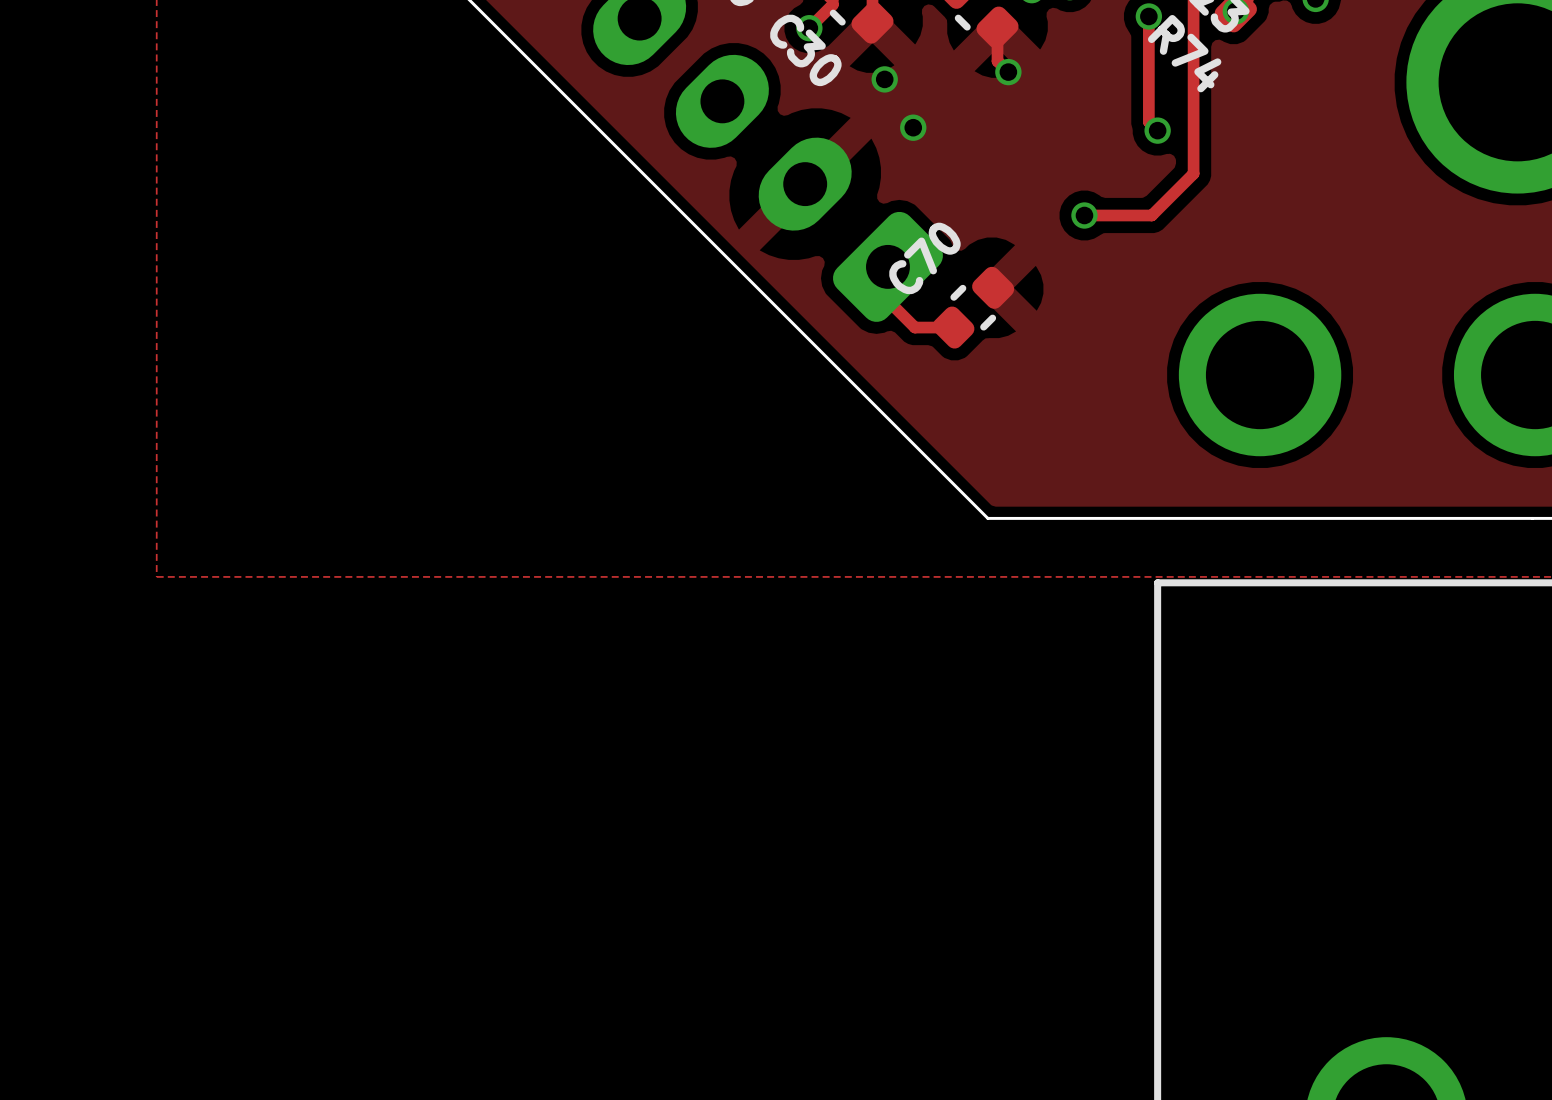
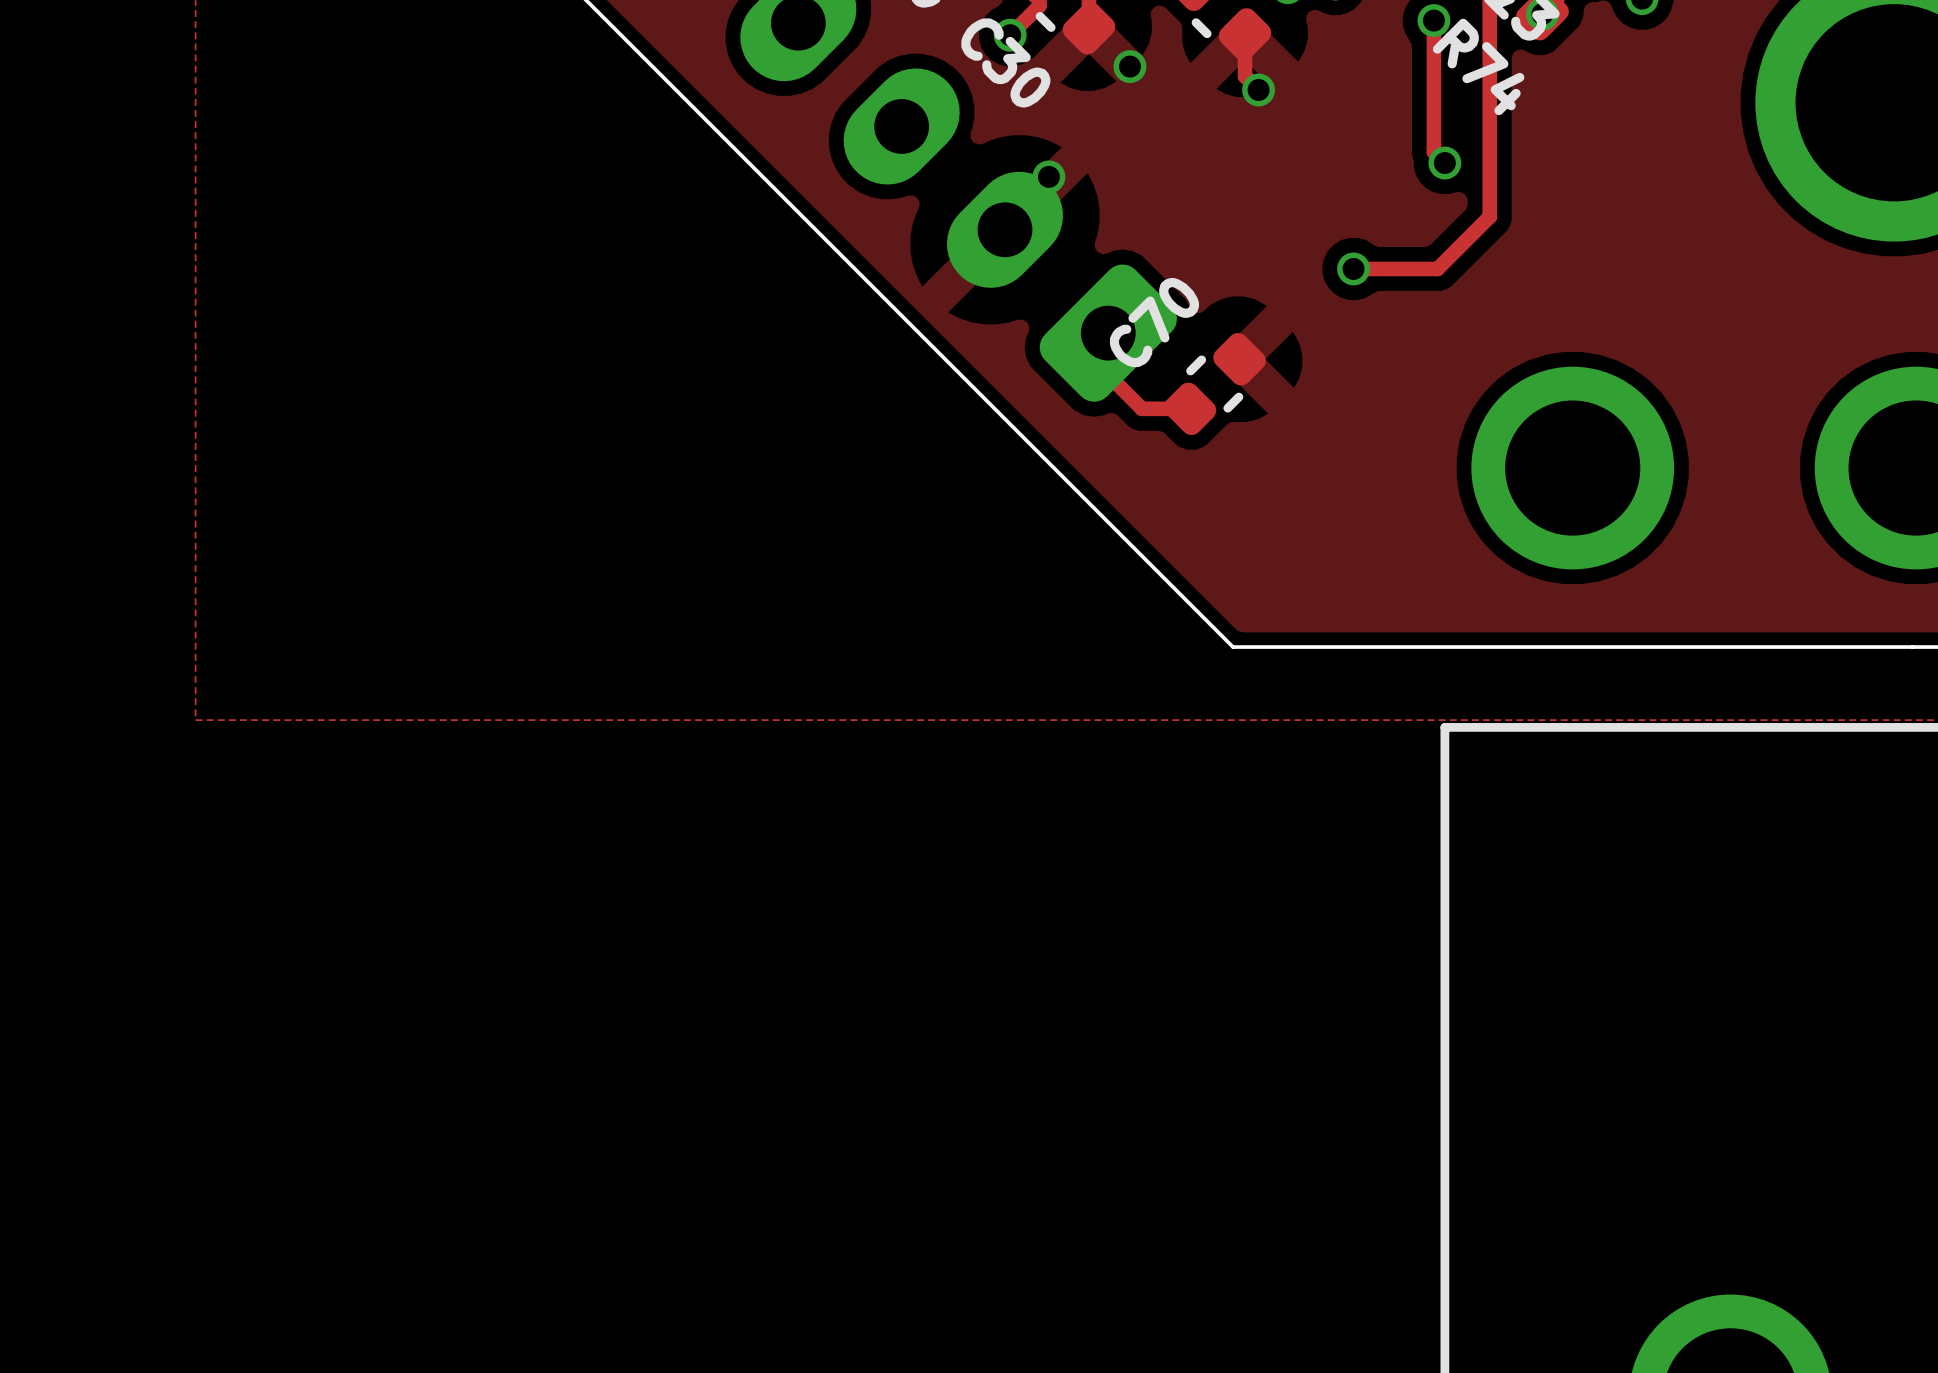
via position: (884, 79) -> (1130, 66)
via: (913, 127) -> none
via: none -> (1048, 176)

